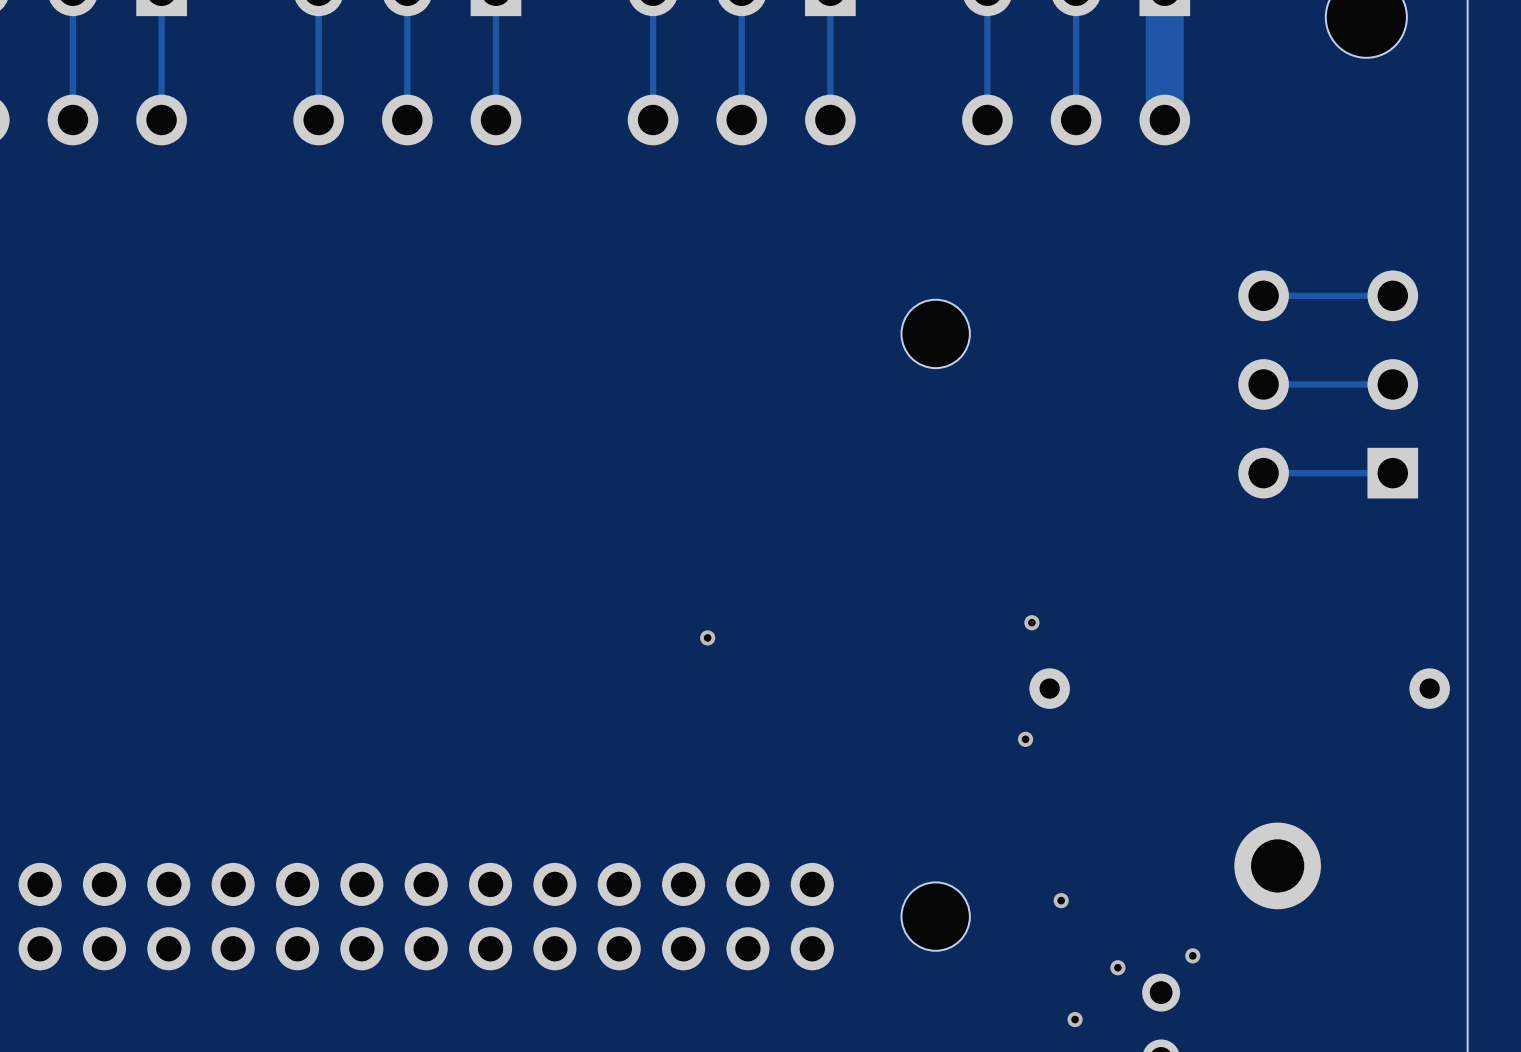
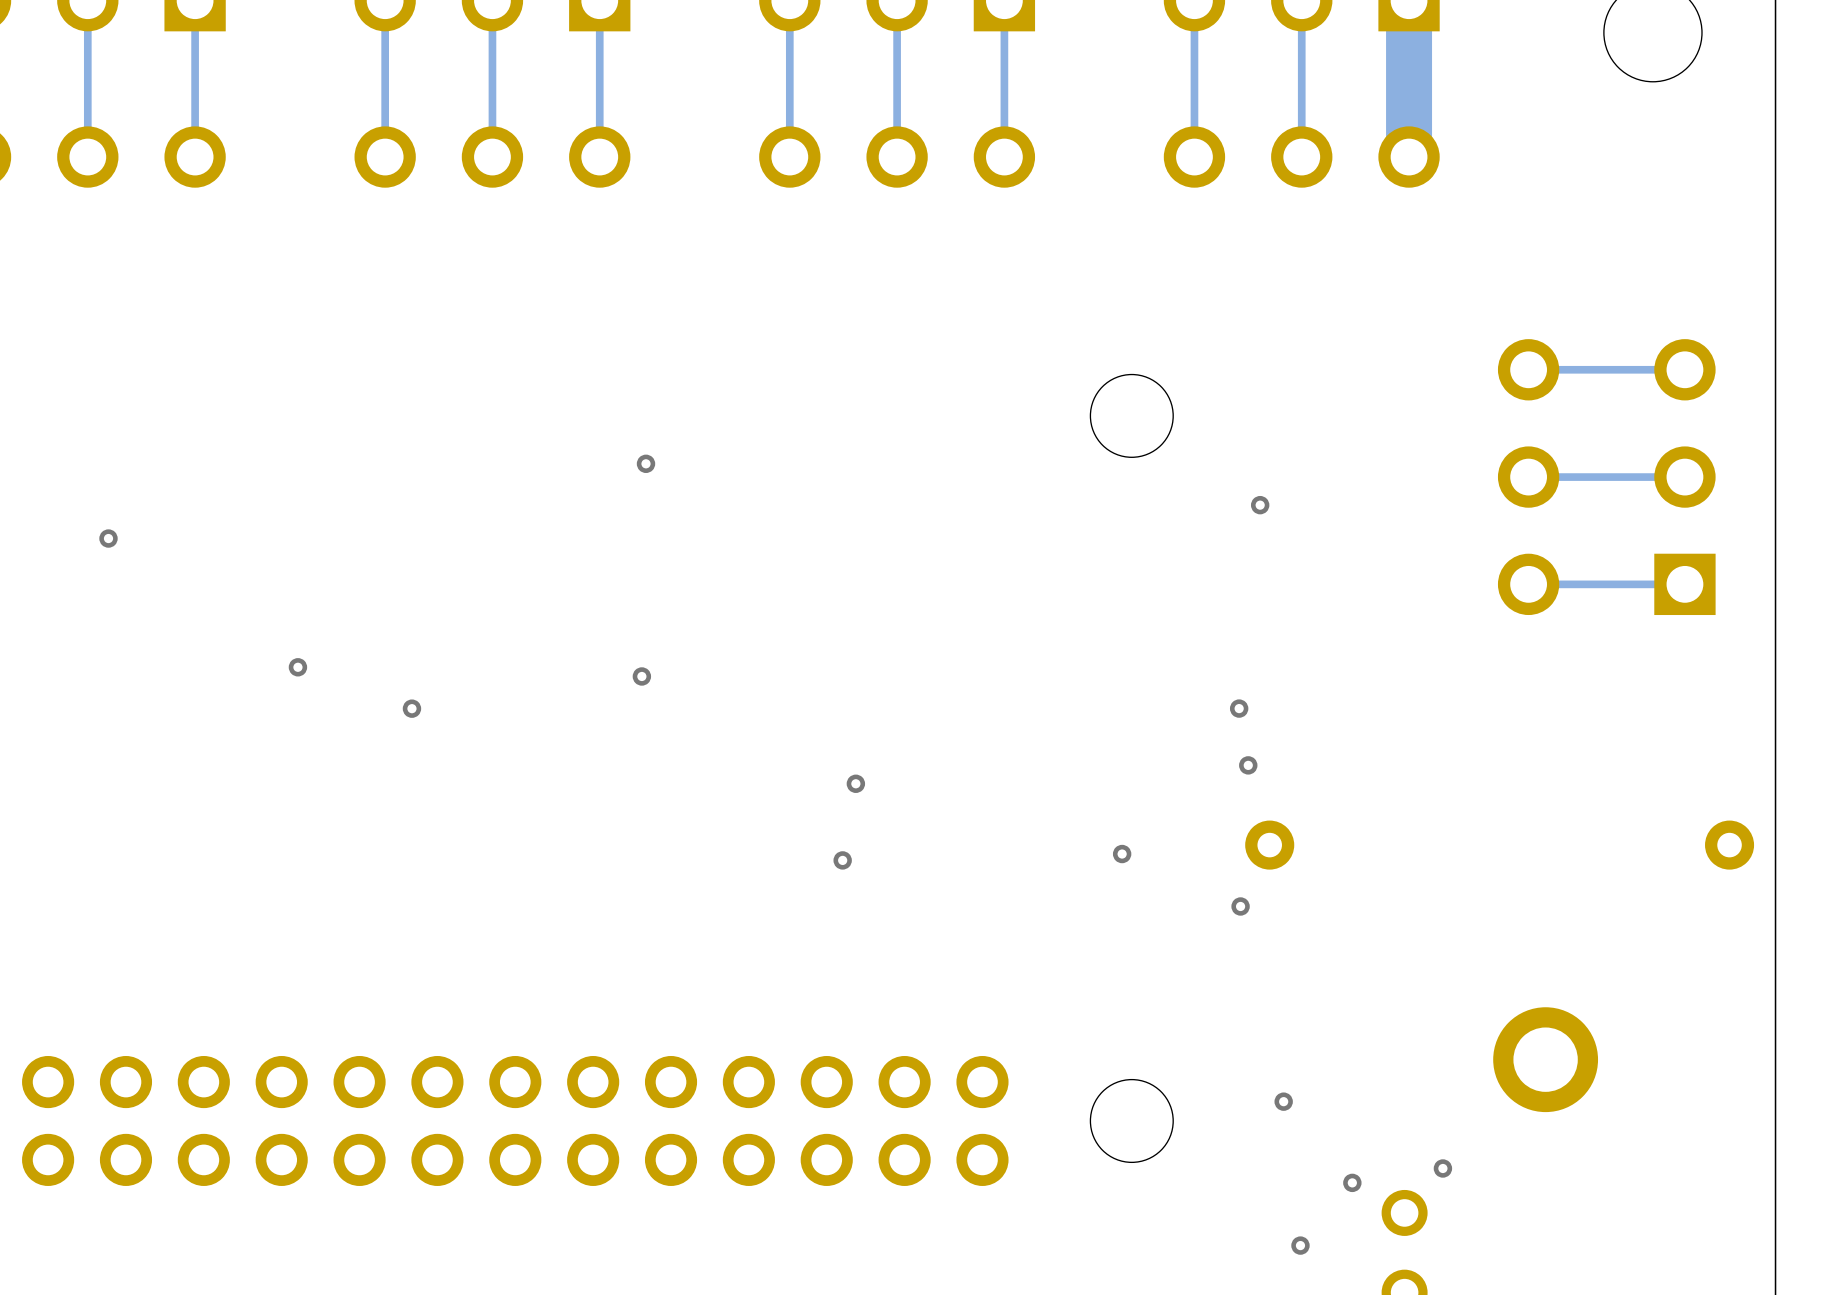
via: none -> (646, 463)
via: none -> (1260, 505)
via: none -> (108, 538)
via: none -> (297, 667)
via: none -> (641, 676)
via: none -> (411, 708)
via: none -> (1239, 708)
via: none -> (1122, 854)
via: none -> (842, 860)

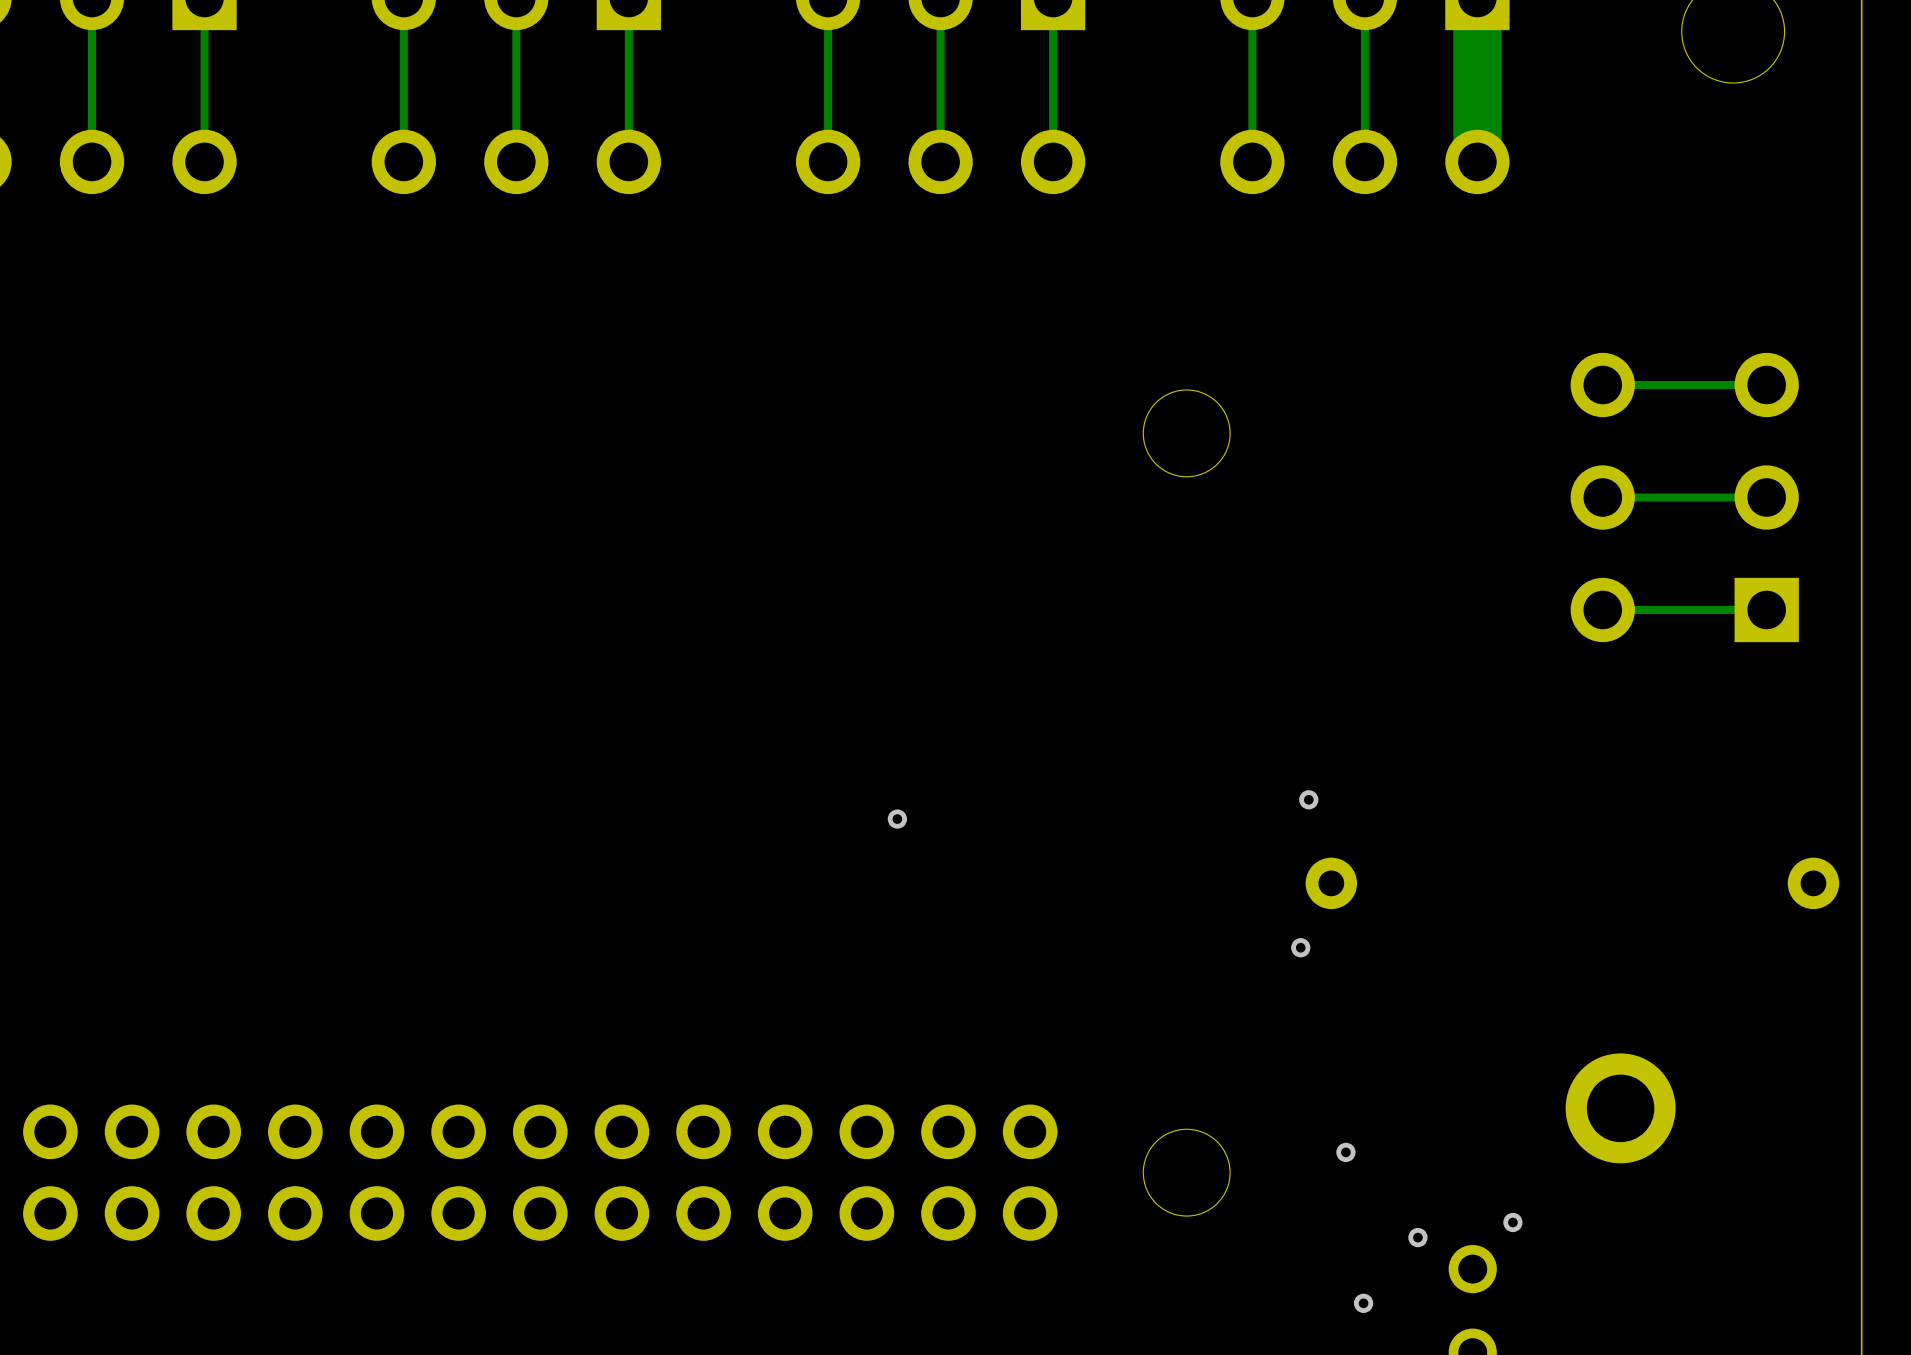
via: (646, 463) -> none
via: (1260, 505) -> none
via: (108, 538) -> none
via: (297, 667) -> none
via: (641, 676) -> none
via: (411, 708) -> none
via: (1239, 708) -> none
via: (1122, 854) -> none
via: (842, 860) -> none

